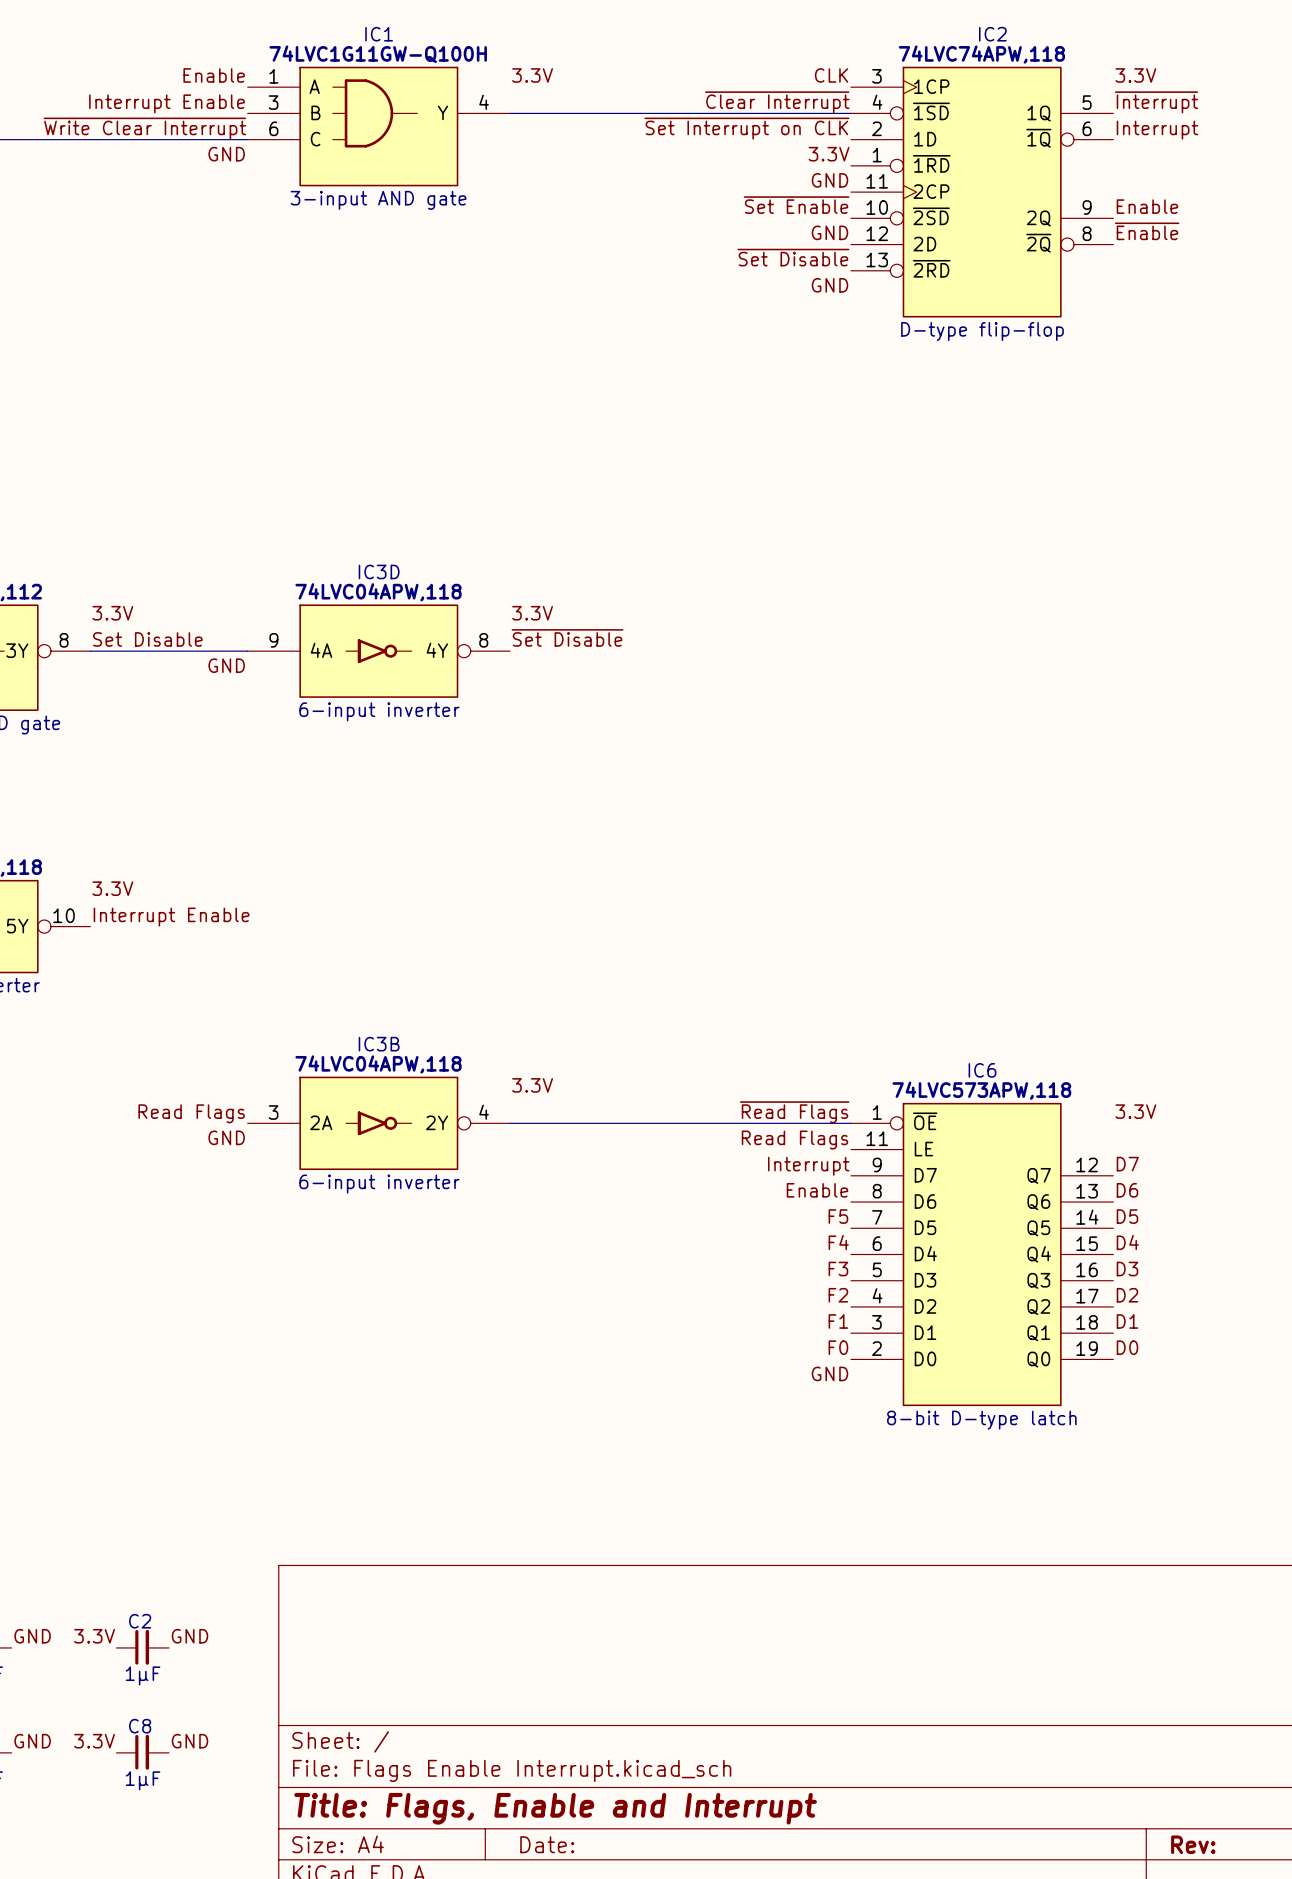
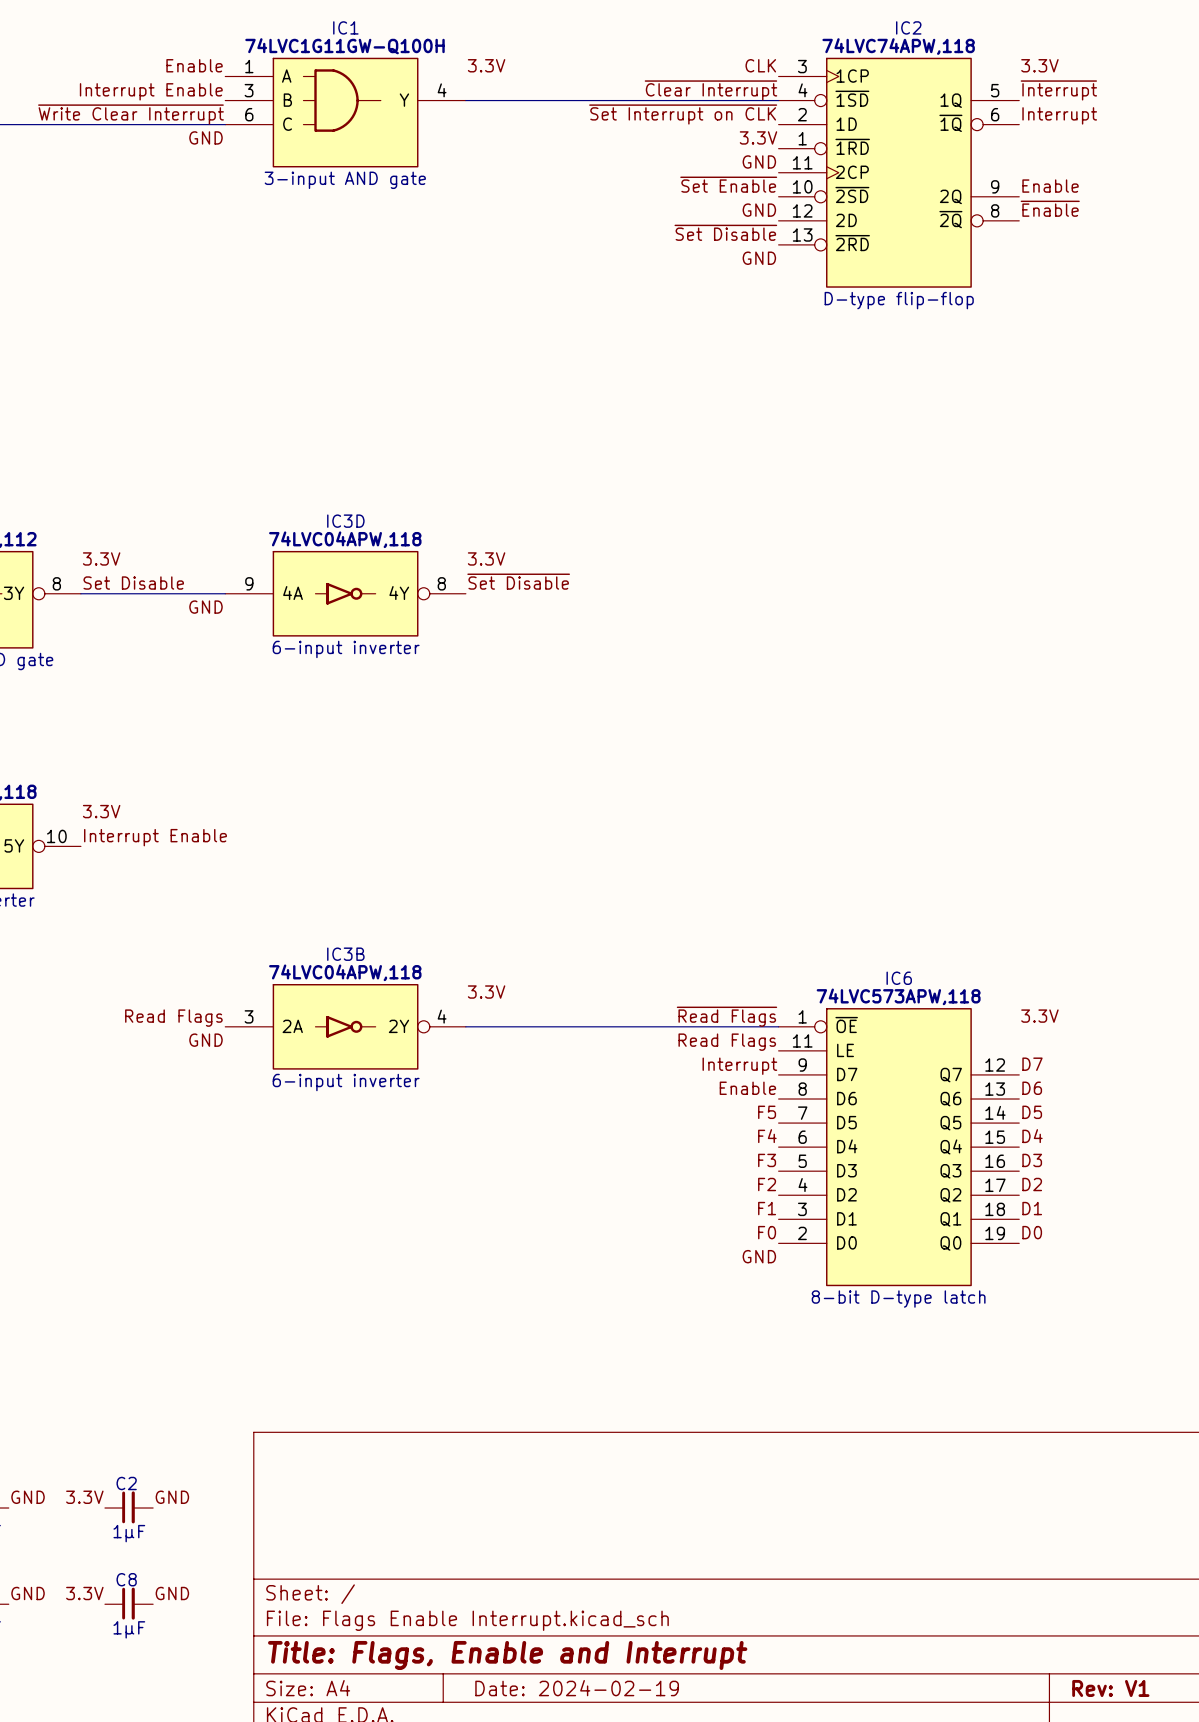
title block: Date: (547, 1844) -> Date: 2024-02-19 (577, 1688)
title block: Rev: (1193, 1844) -> Rev: V1 (1110, 1688)

